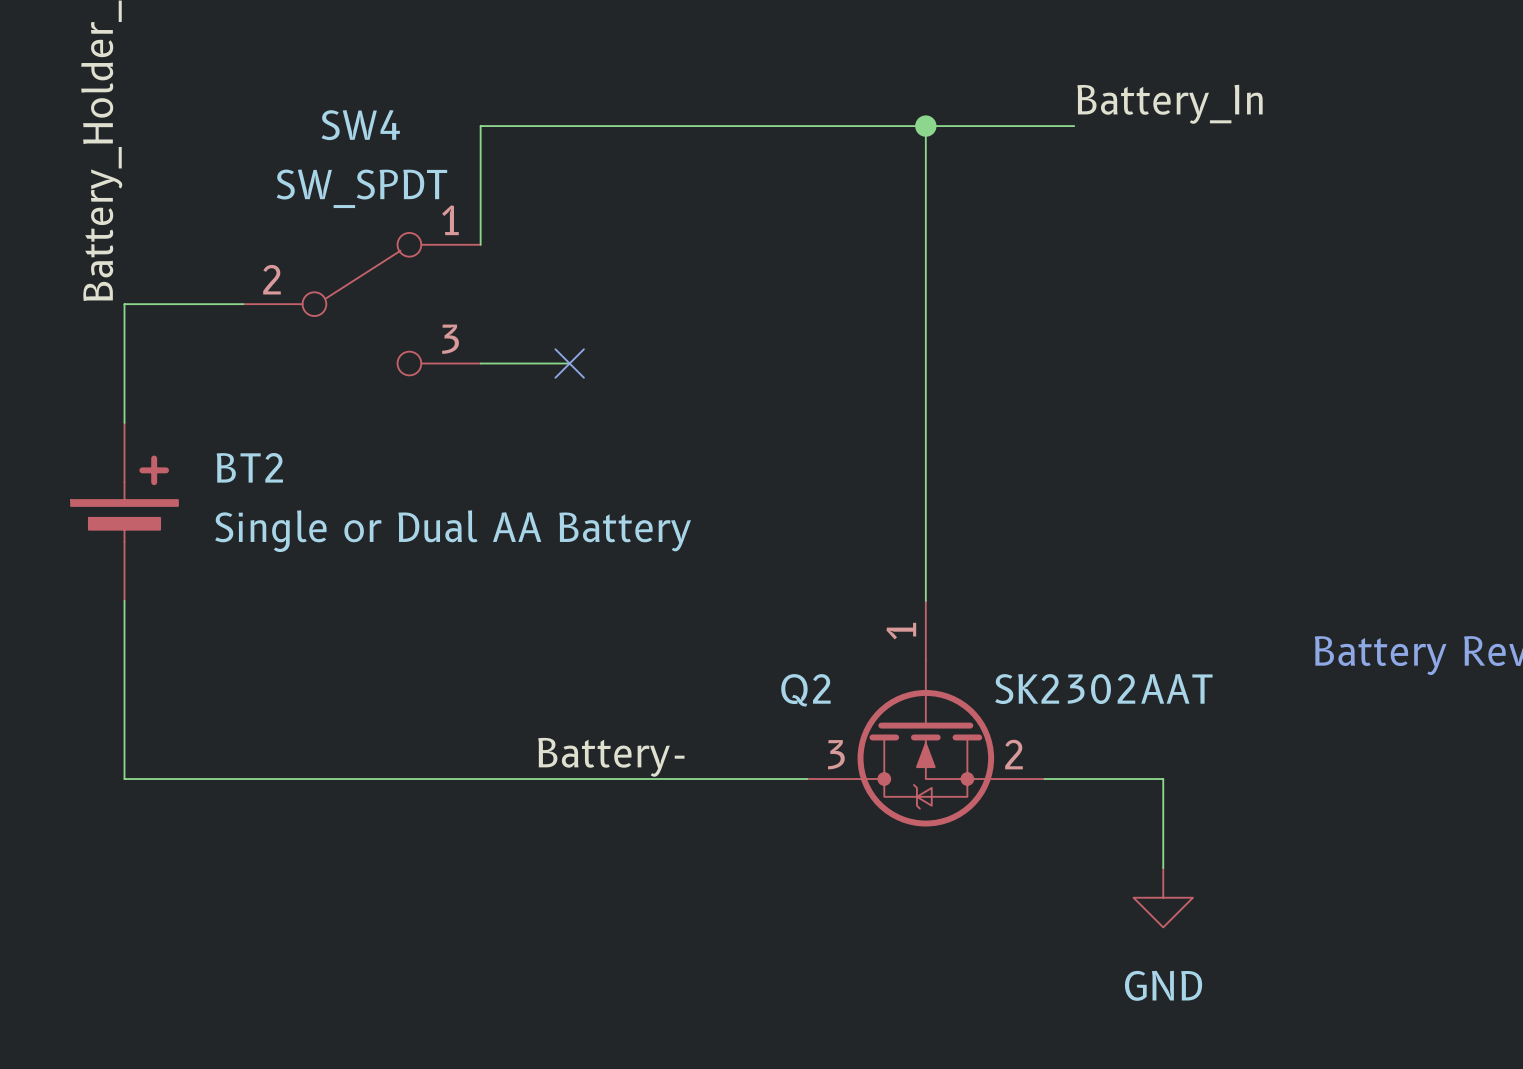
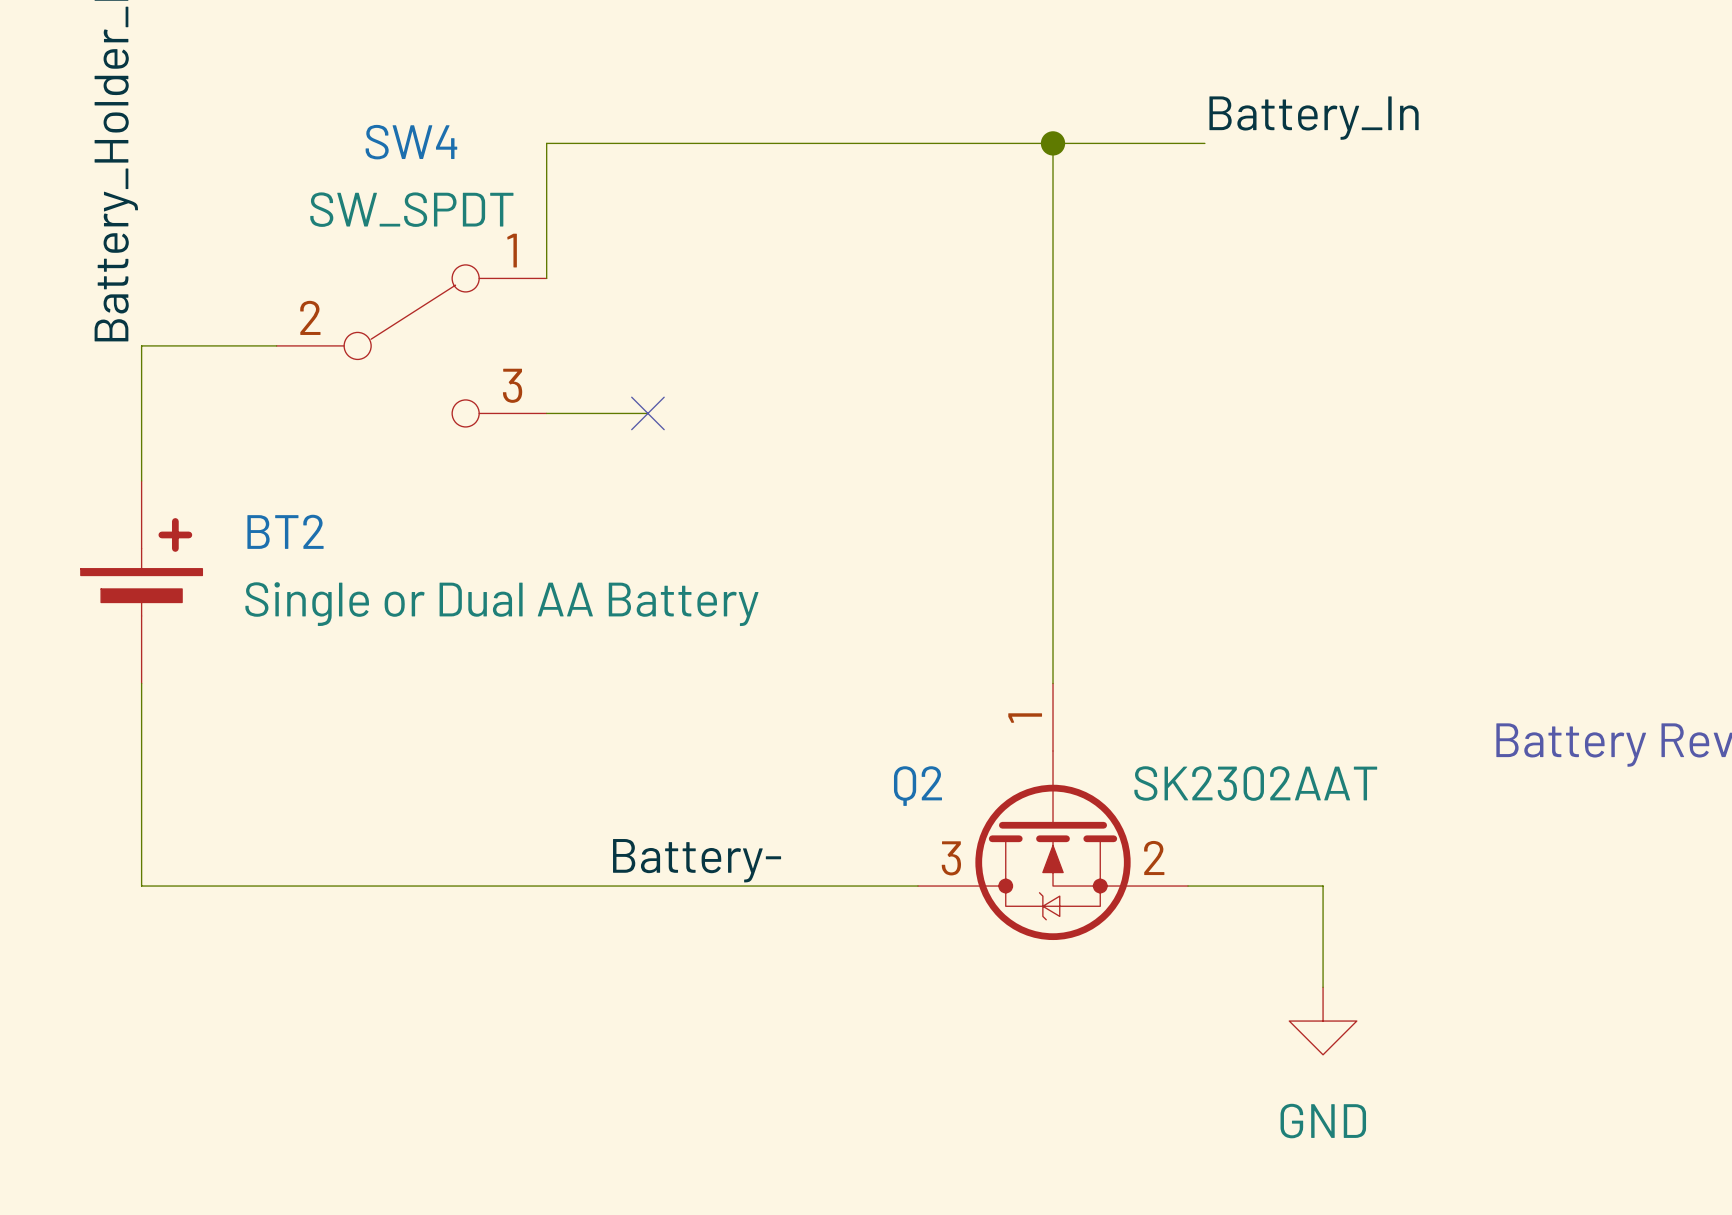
label position: Battery_In (1170, 104) -> Battery_In (1314, 118)
wire: (1059, 126) (1074, 126) -> none

